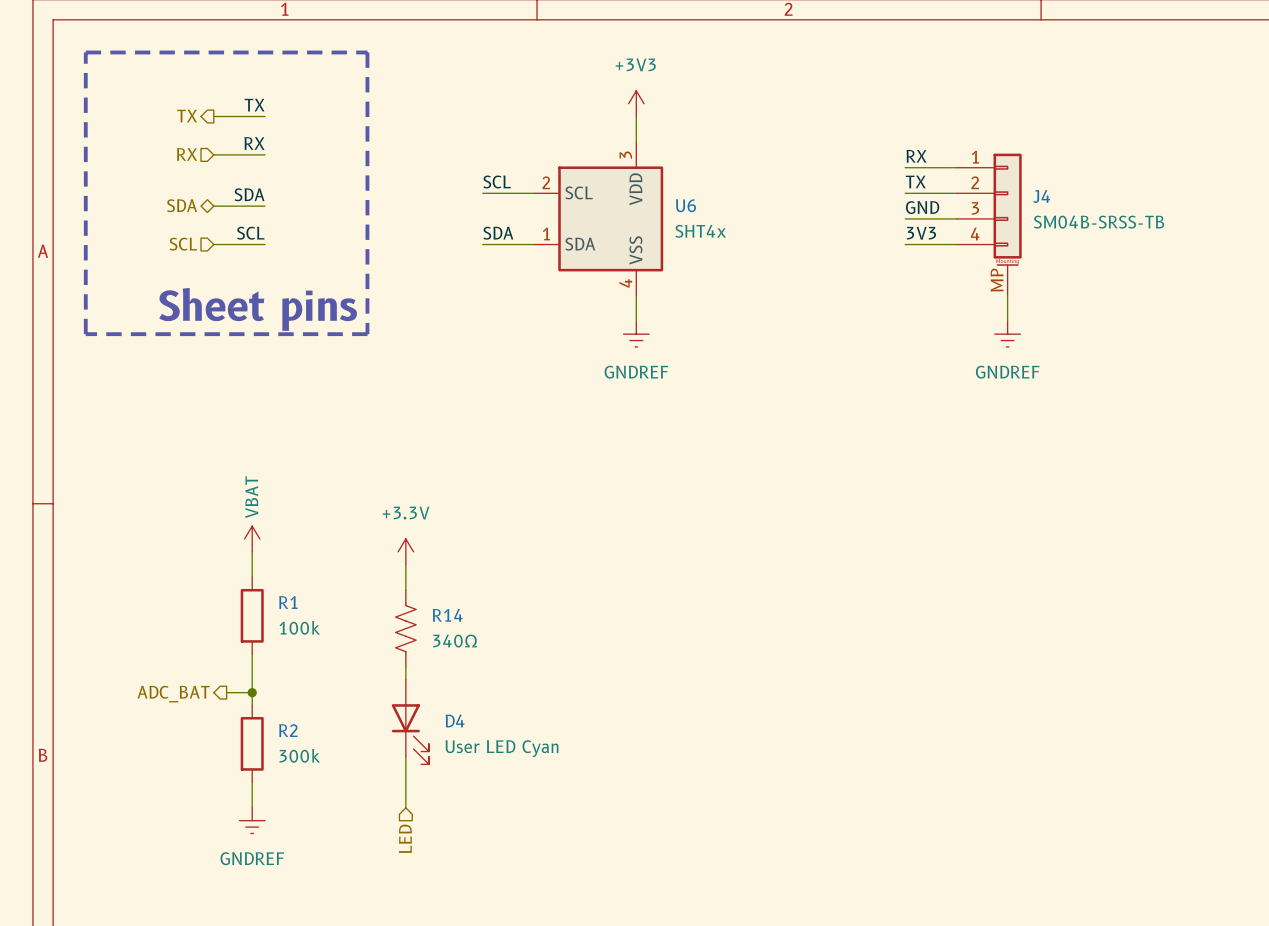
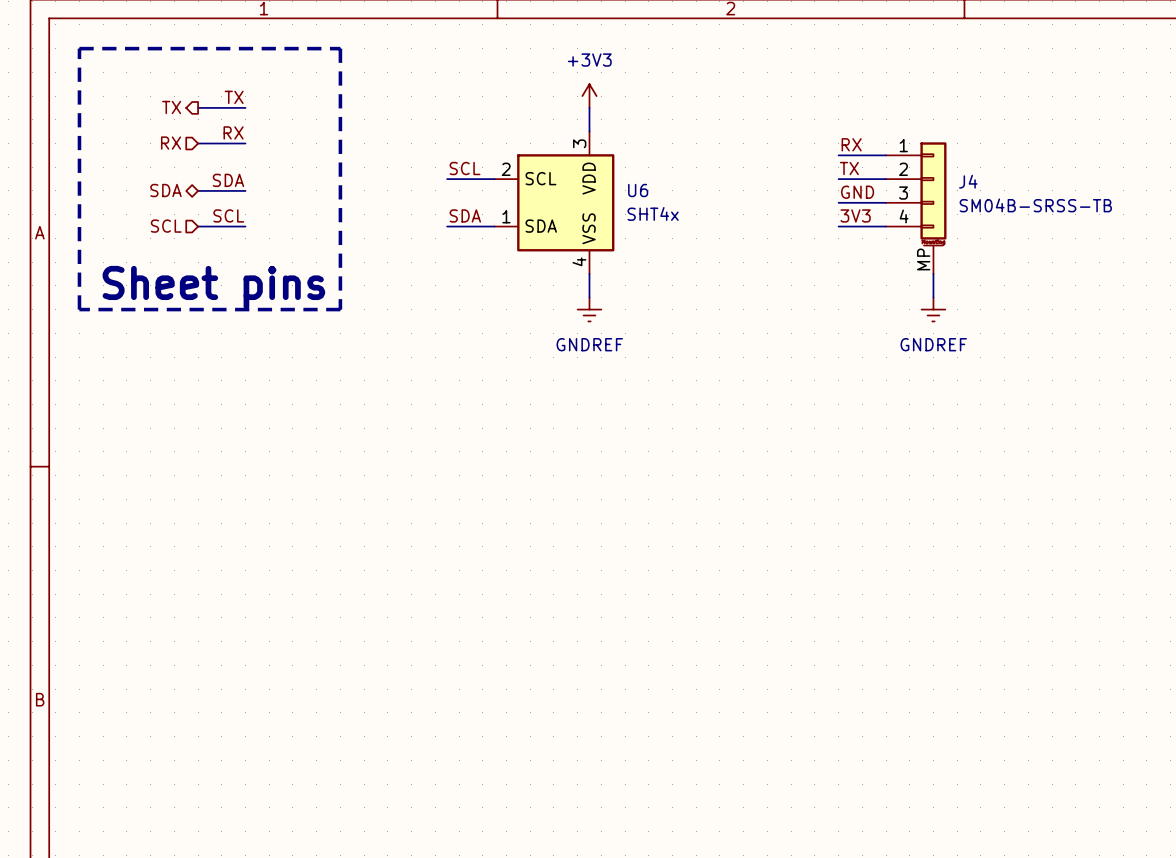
power symbol: VBAT (252, 539) -> none
wire: (252, 551) (252, 577) -> none
power symbol: +3.3V (405, 551) -> none
wire: (405, 564) (405, 590) -> none
R1: 100k (252, 615) -> none
R14: 340Ω (405, 628) -> none
wire: (252, 654) (252, 705) -> none
wire: (405, 667) (405, 679) -> none
wire: (226, 692) (252, 692) -> none
junction: (252, 692) -> none
hierarchical label: ADC_BAT (173, 694) -> none
D4: User LED Cyan (410, 722) -> none
R2: 300k (252, 743) -> none
wire: (405, 756) (405, 807) -> none
wire: (252, 782) (252, 807) -> none
power symbol: GNDREF (252, 820) -> none
hierarchical label: LED (405, 838) -> none

